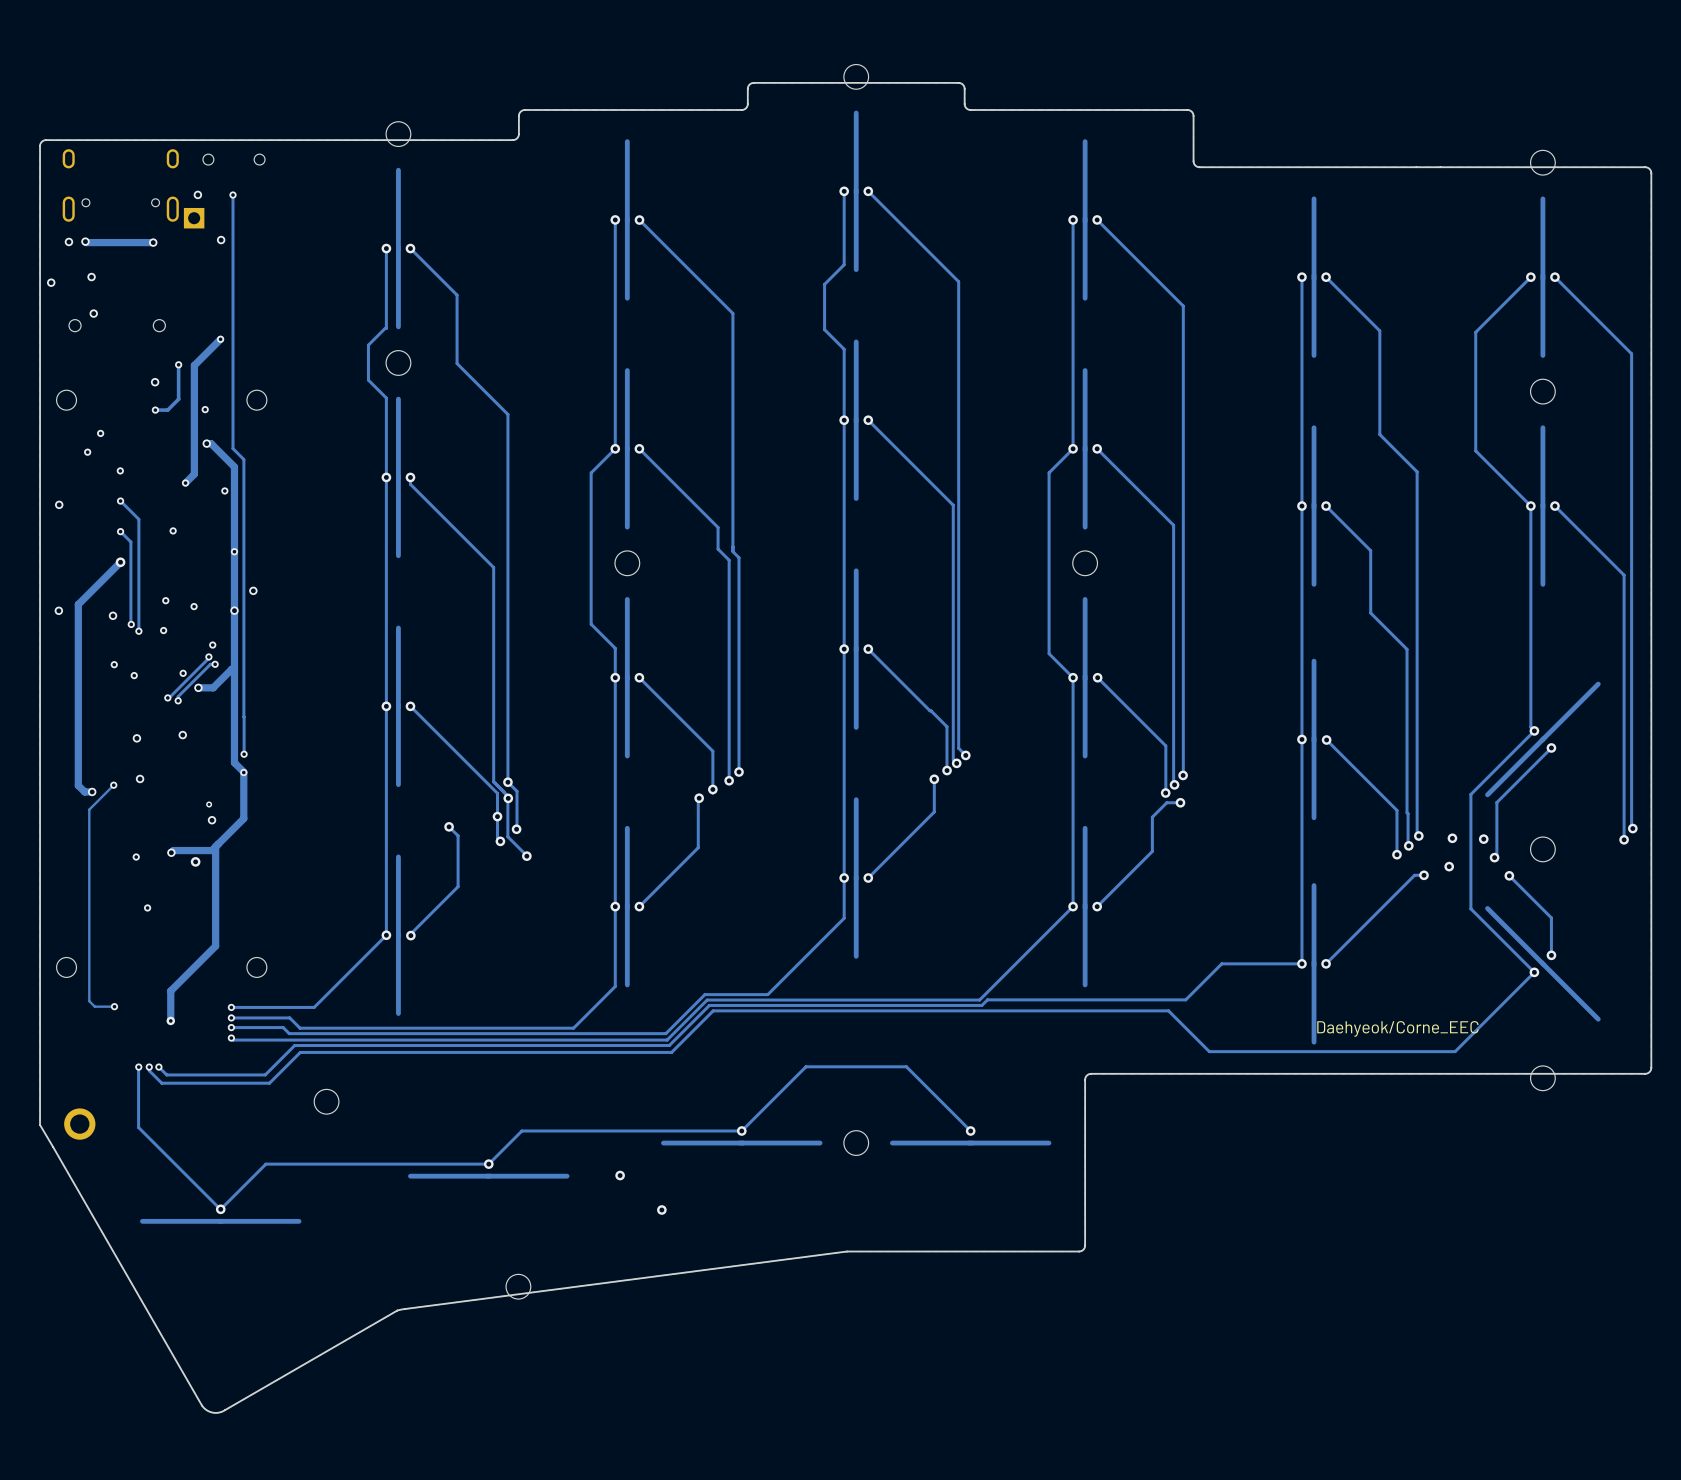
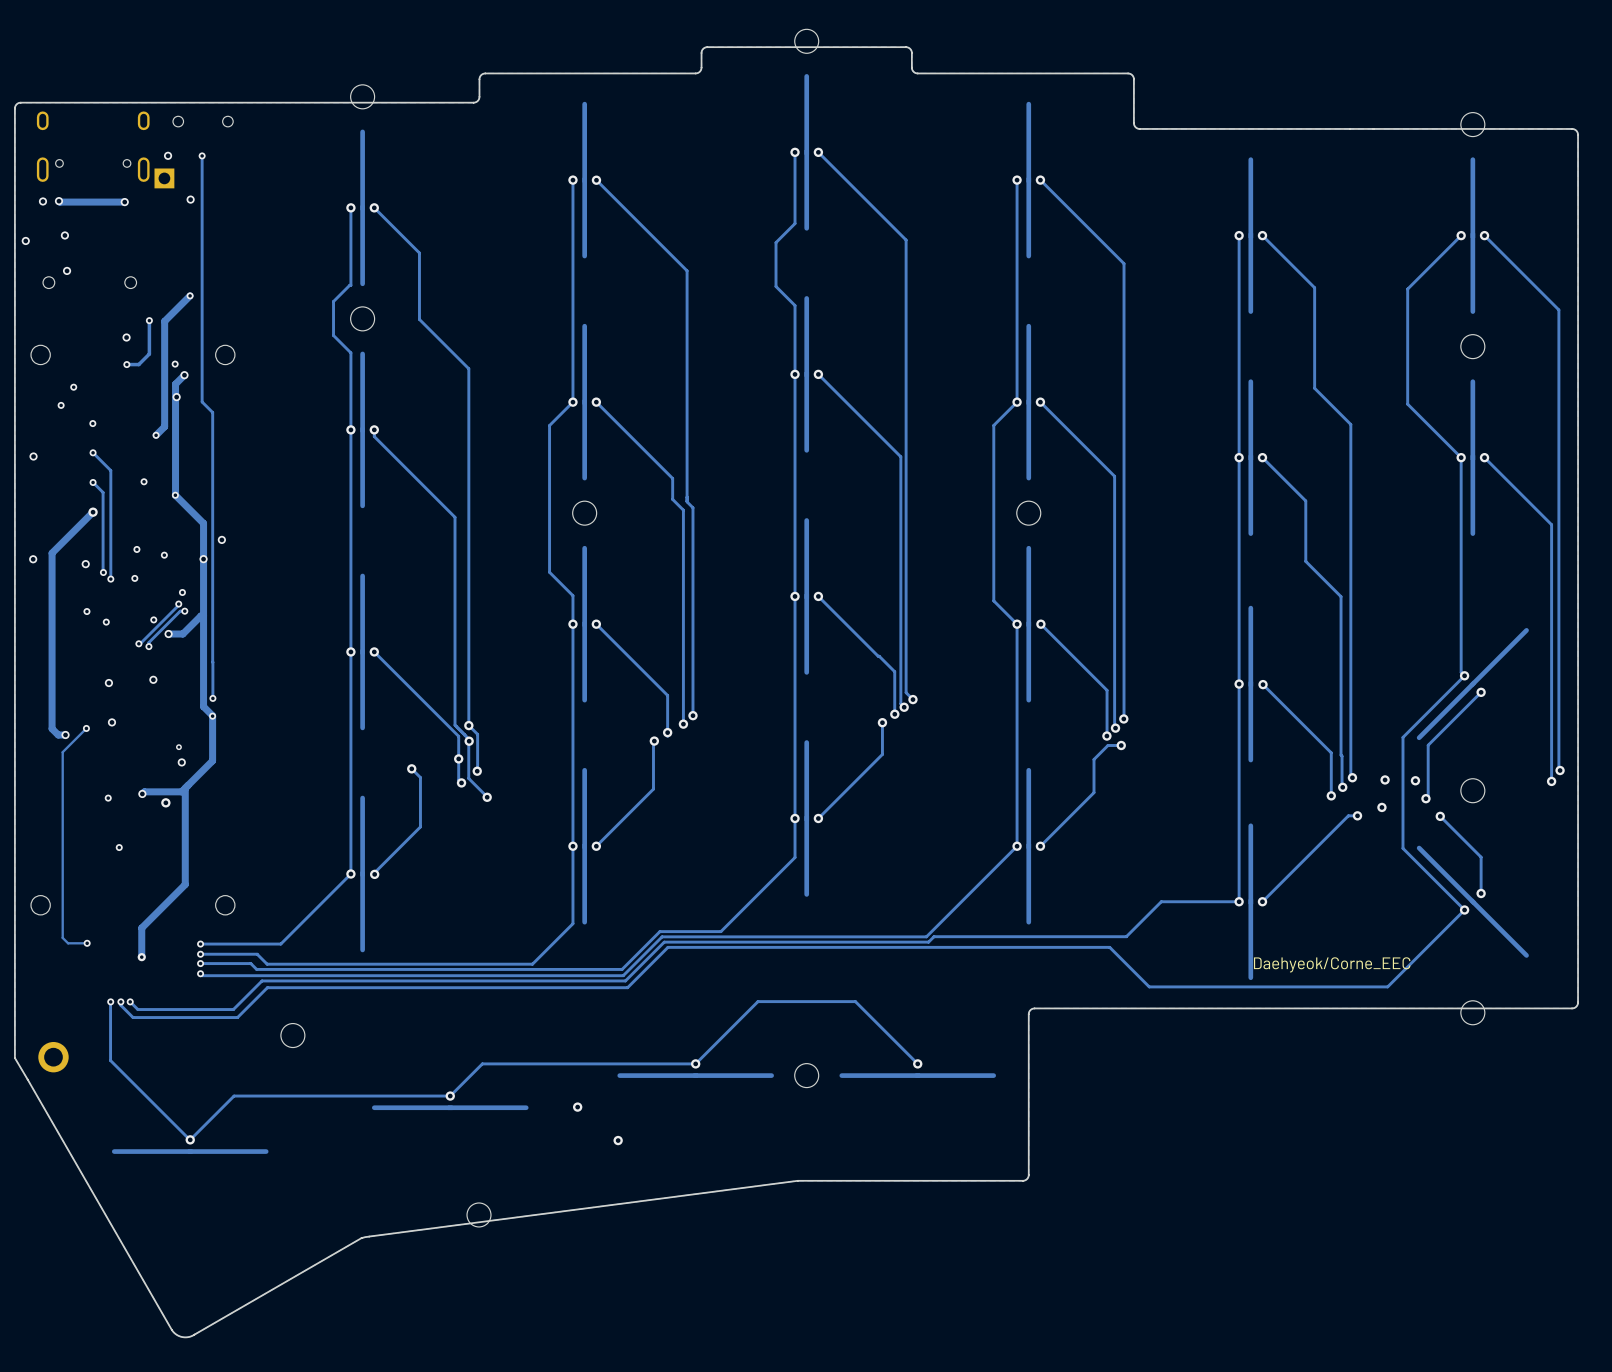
track: none -> (184, 375) (175, 384) (175, 495)
via: none -> (184, 375)
track: (206, 443) (211, 443) (234, 466) (234, 573) -> (175, 495) (203, 523)
via: (224, 490) -> none
via: none -> (175, 495)
via: (234, 551) -> none

